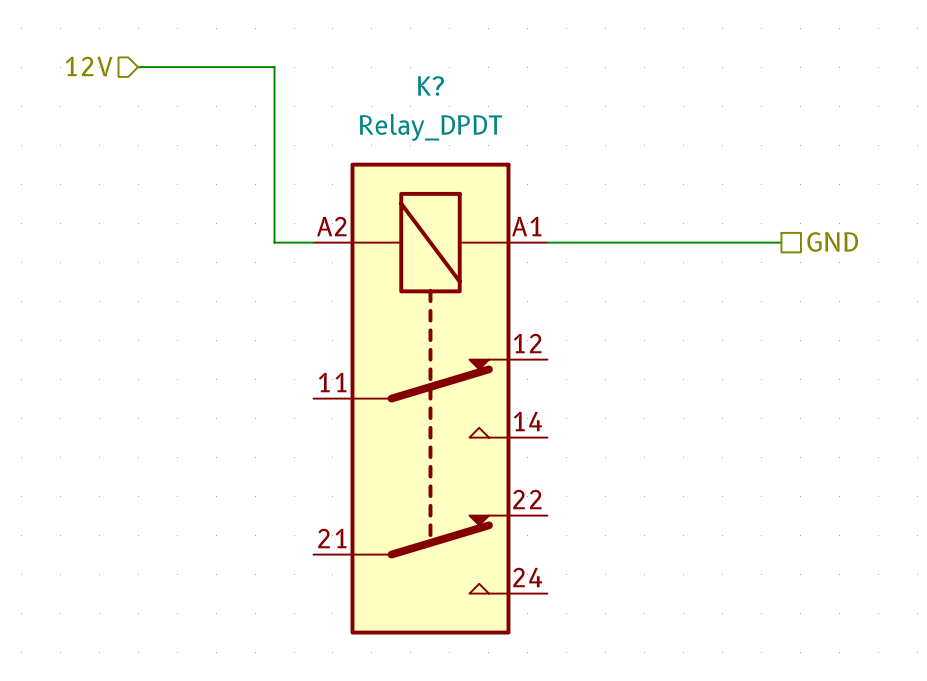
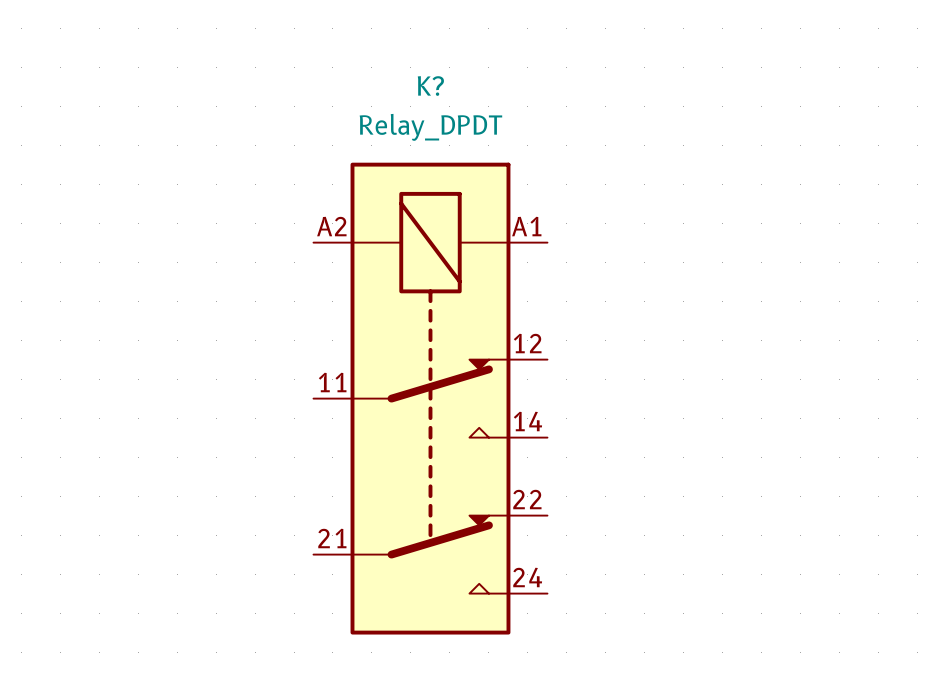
hierarchical label: 12V (89, 66) -> none
wire: (138, 67) (274, 67) (274, 242) (313, 242) -> none
wire: (547, 242) (781, 242) -> none
hierarchical label: GND (832, 242) -> none

